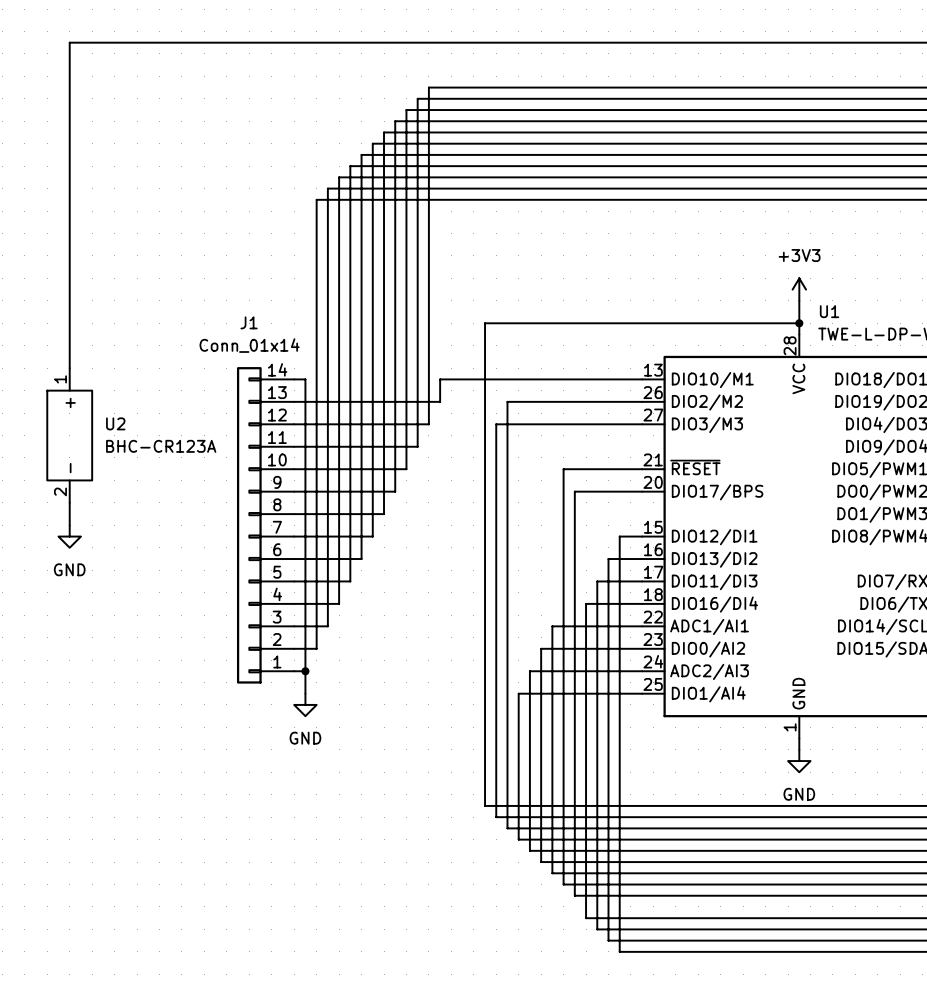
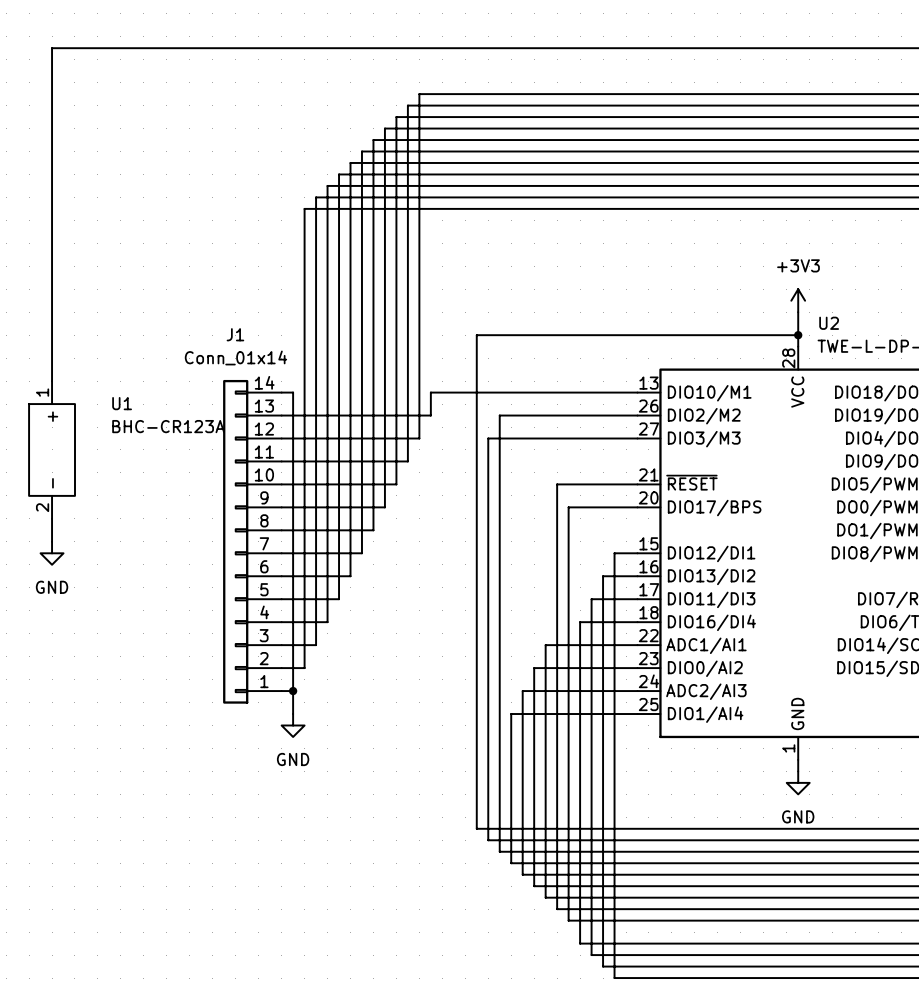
U1 name: U1 (829, 311) -> U2 (829, 323)
U2 name: U2 (115, 423) -> U1 (122, 403)
U2 value position: BHC-CR123A (161, 446) -> BHC-CR123A (168, 426)

